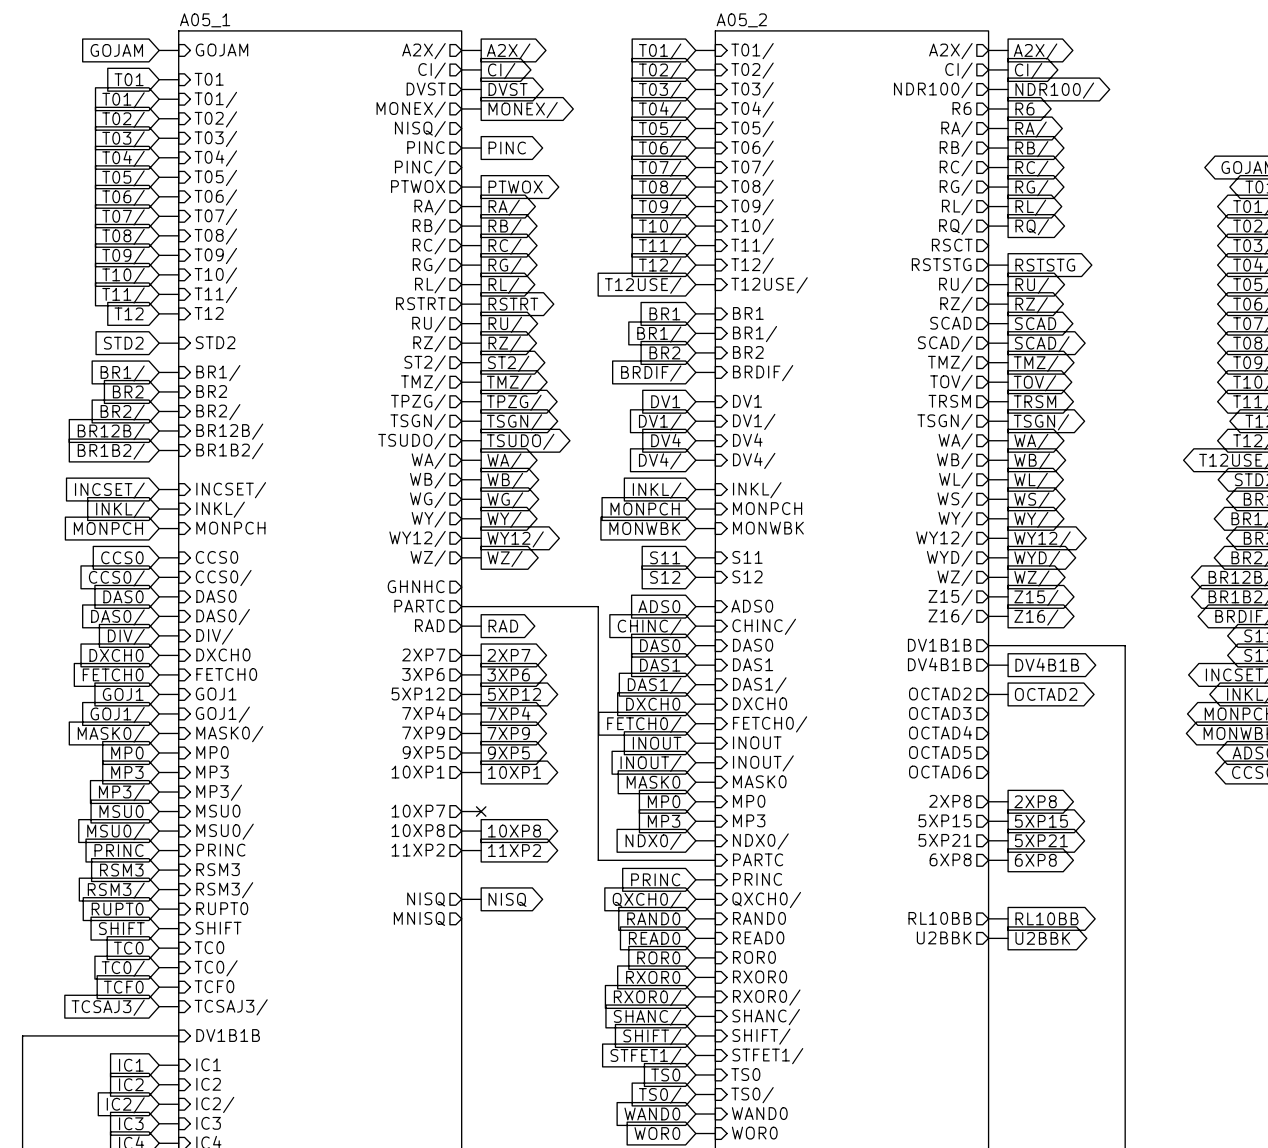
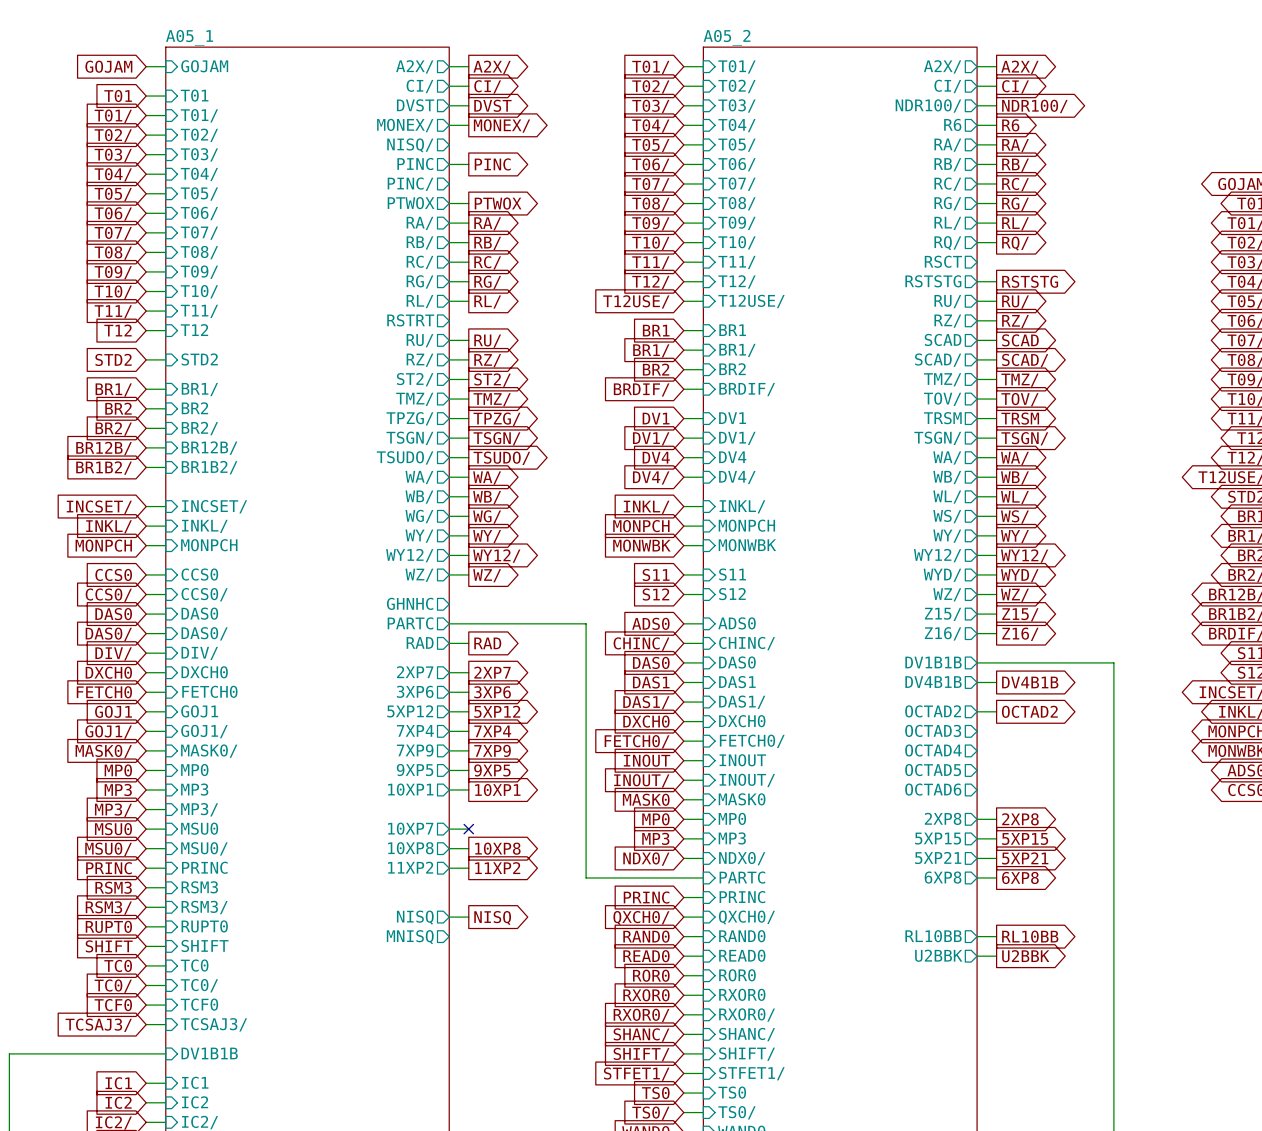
wire: (461, 304) (481, 304) -> none
global label: RSTRT (513, 304) -> none

